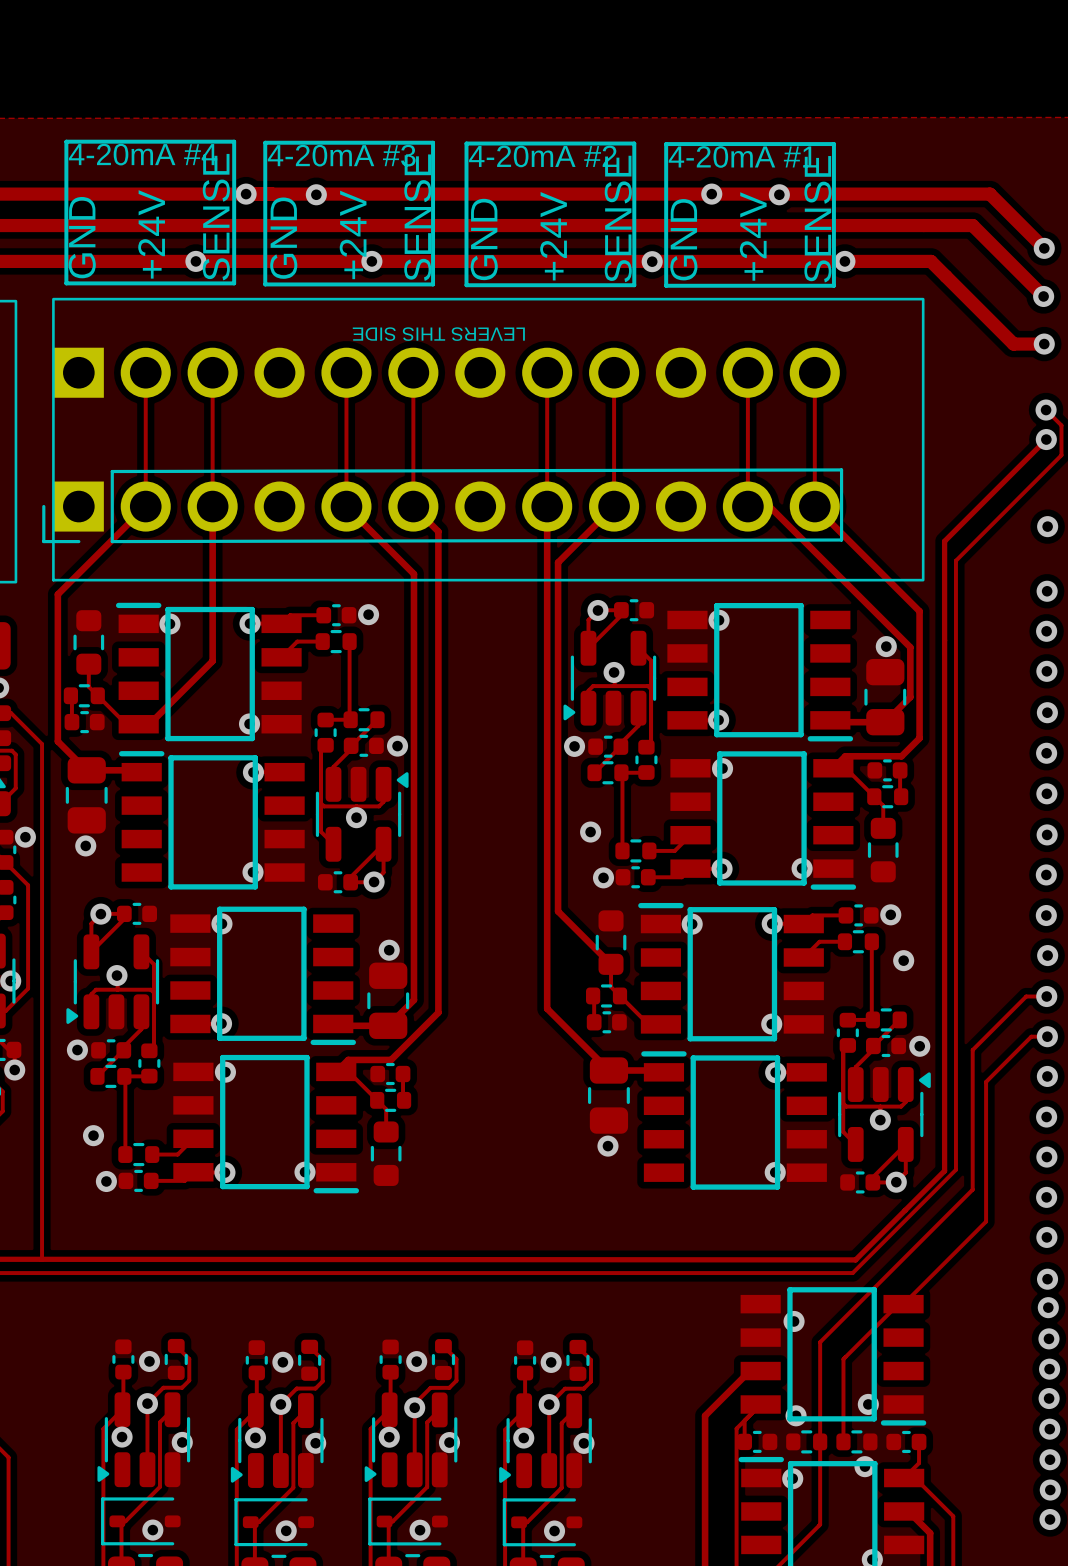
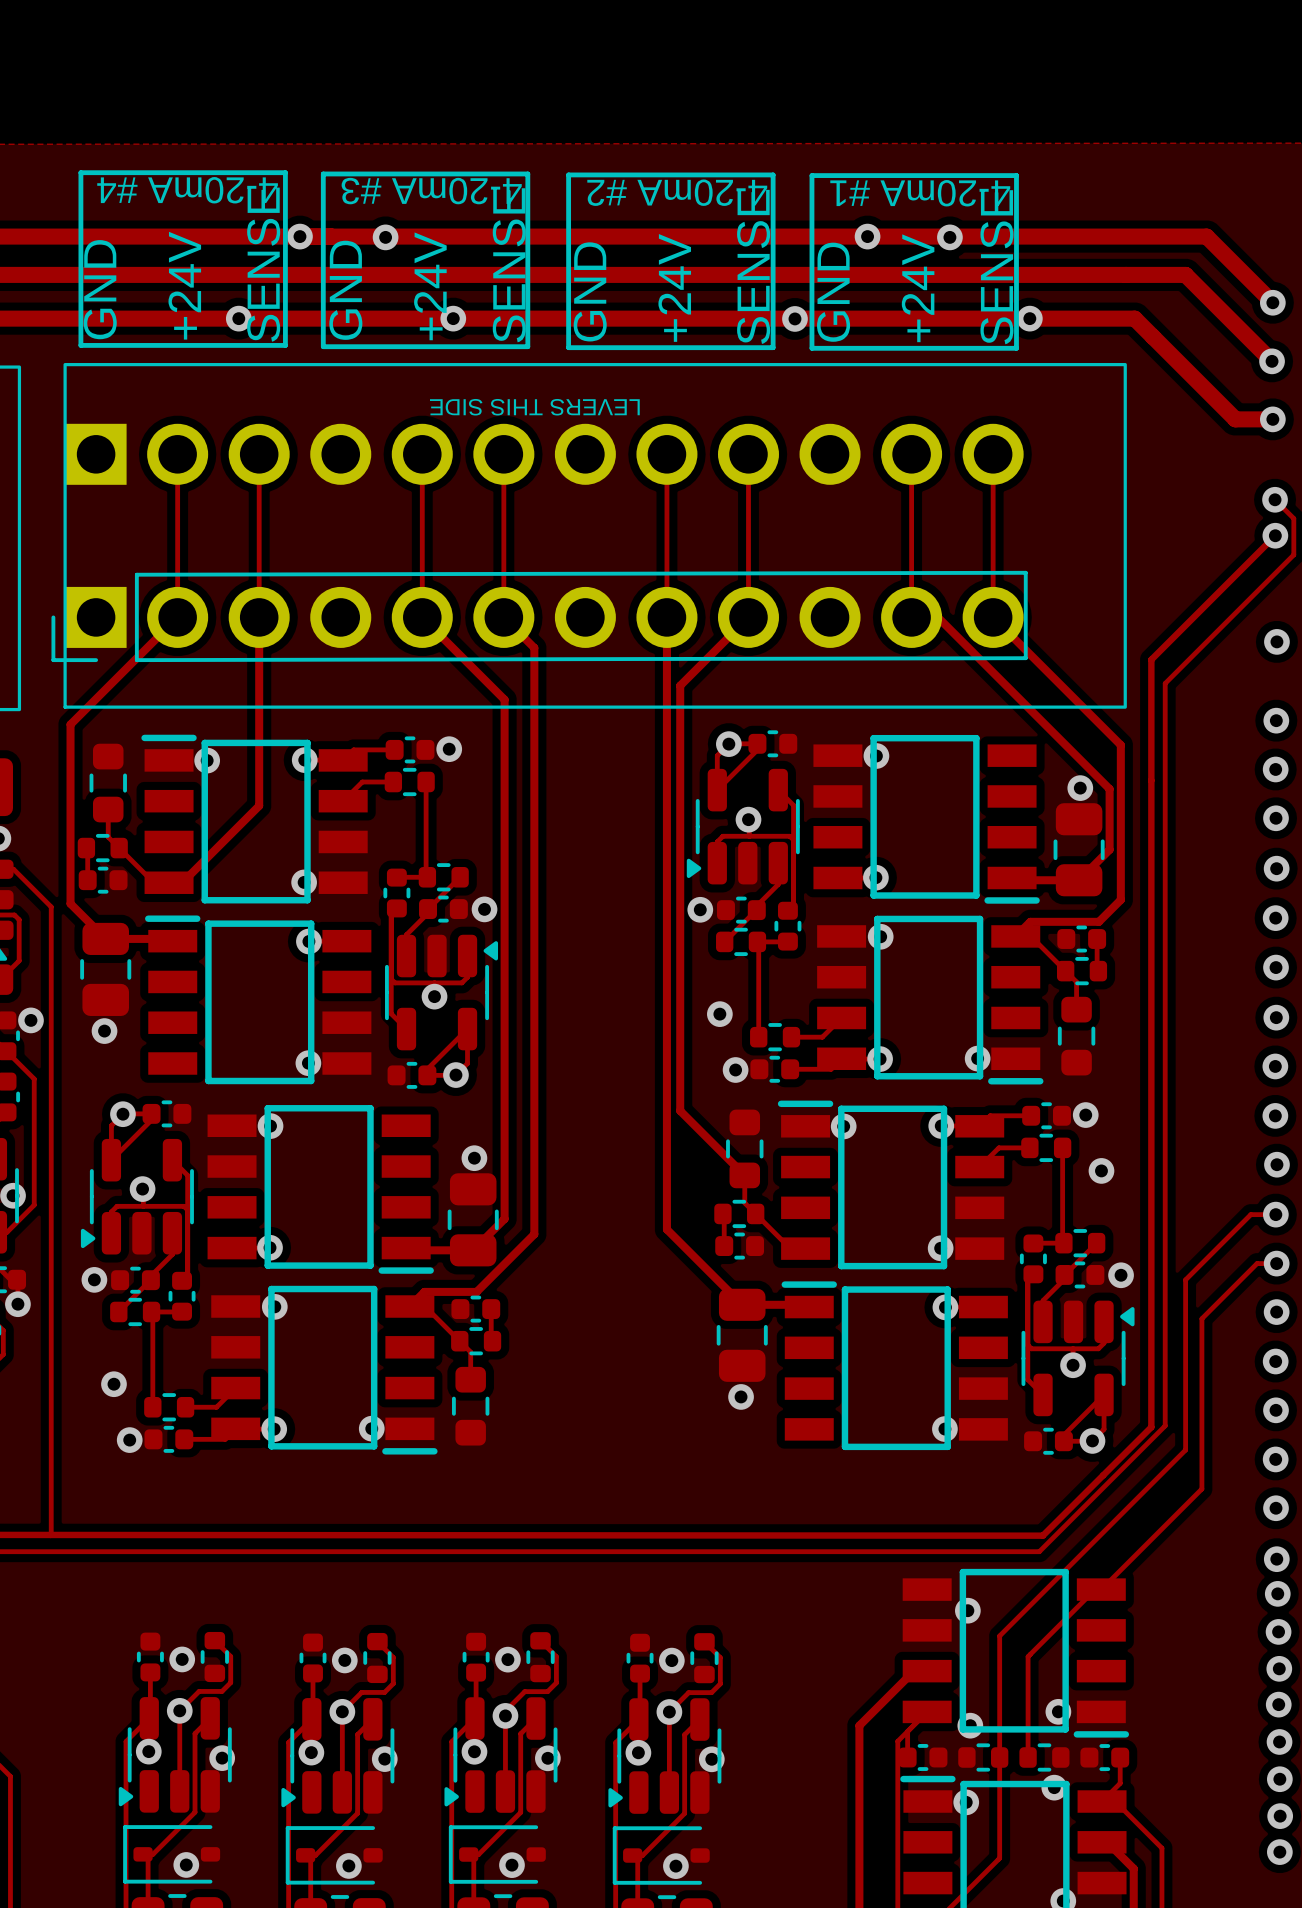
text rotation: 0° (143, 154) -> 180° (187, 190)
text rotation: 0° (341, 155) -> 180° (431, 191)
text rotation: 0° (542, 156) -> 180° (677, 192)
text rotation: 0° (742, 156) -> 180° (920, 193)

